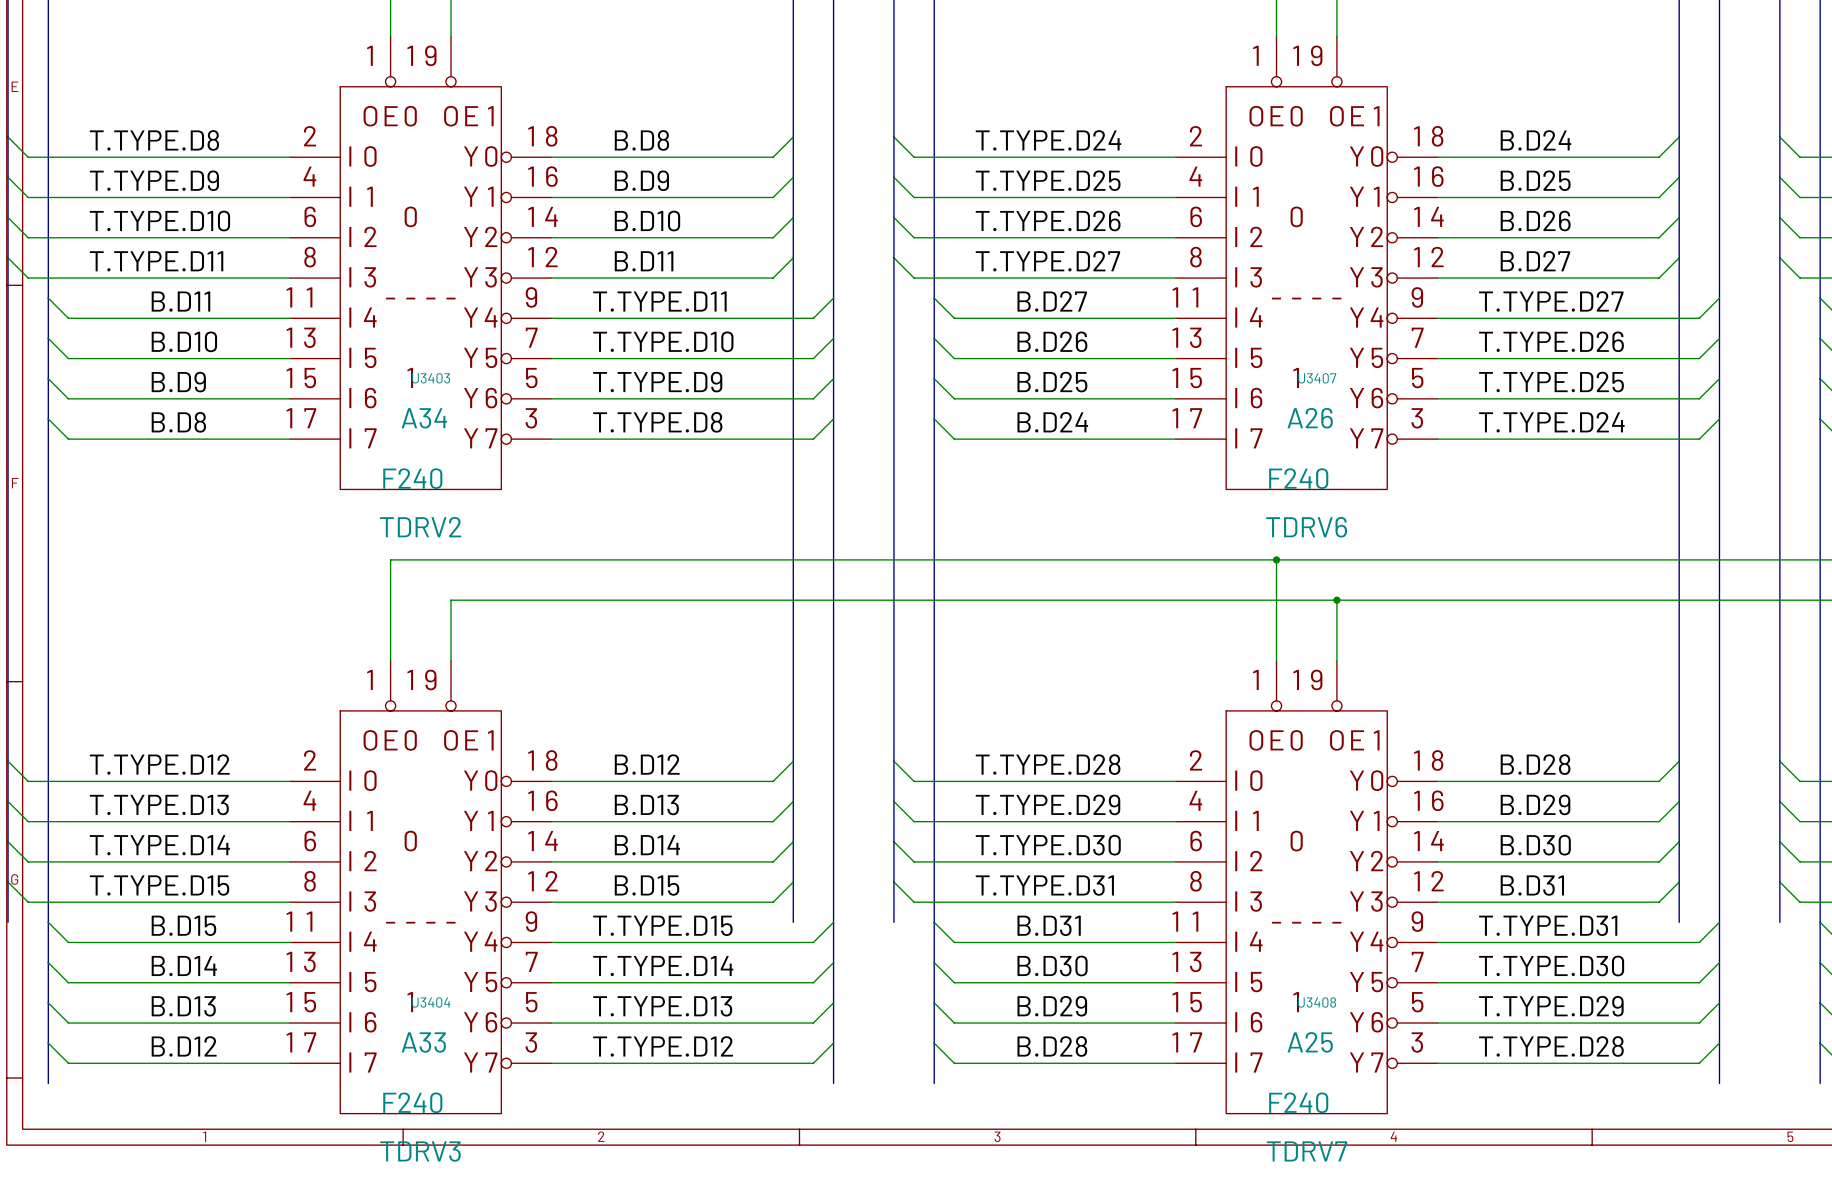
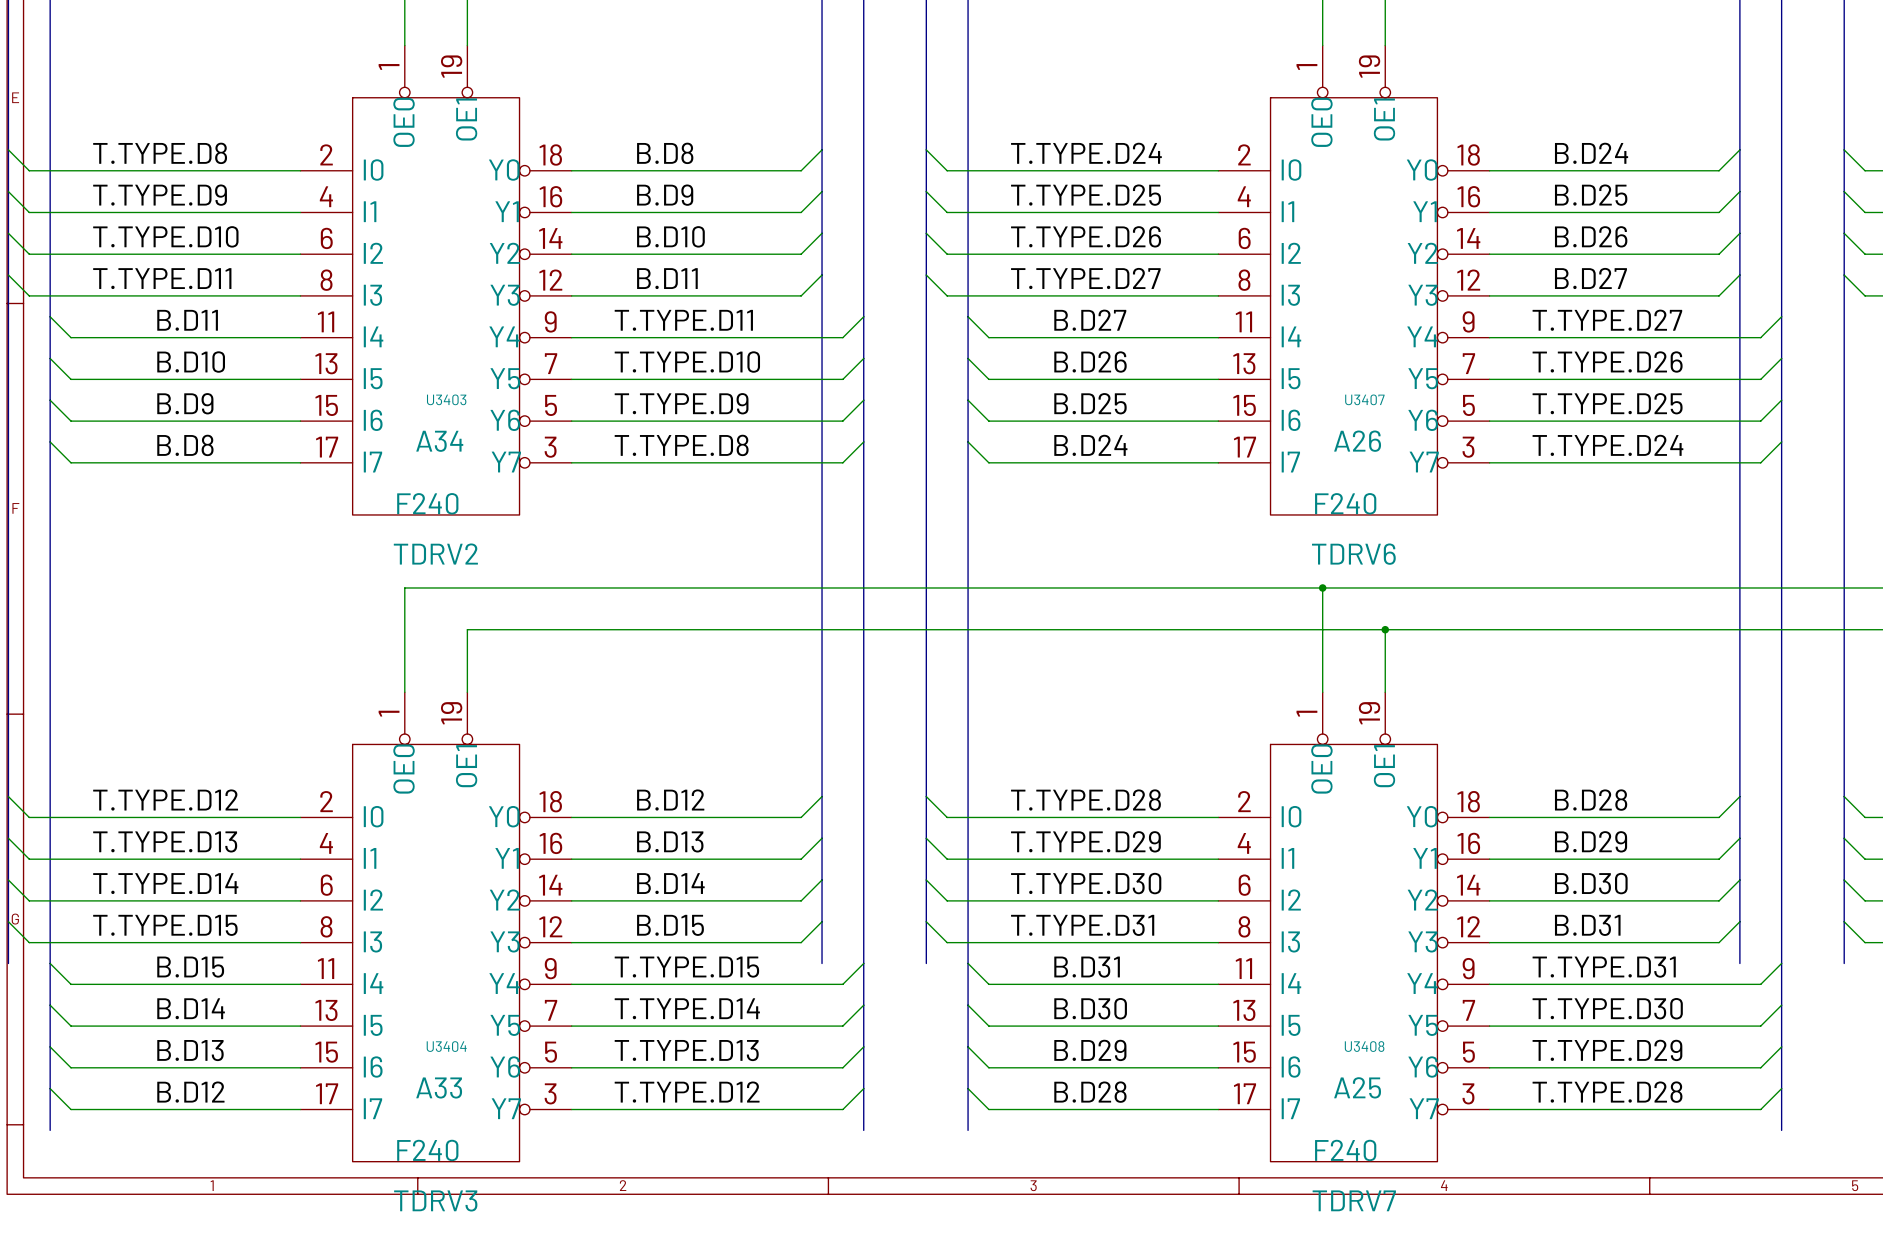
U3403 symbol: [289, 36, 552, 490] -> [300, 45, 572, 515]
U3407 symbol: [1175, 36, 1438, 490] -> [1218, 45, 1490, 515]
U3404 symbol: [289, 660, 552, 1114] -> [300, 692, 572, 1162]
U3408 symbol: [1175, 660, 1438, 1114] -> [1218, 692, 1490, 1162]

